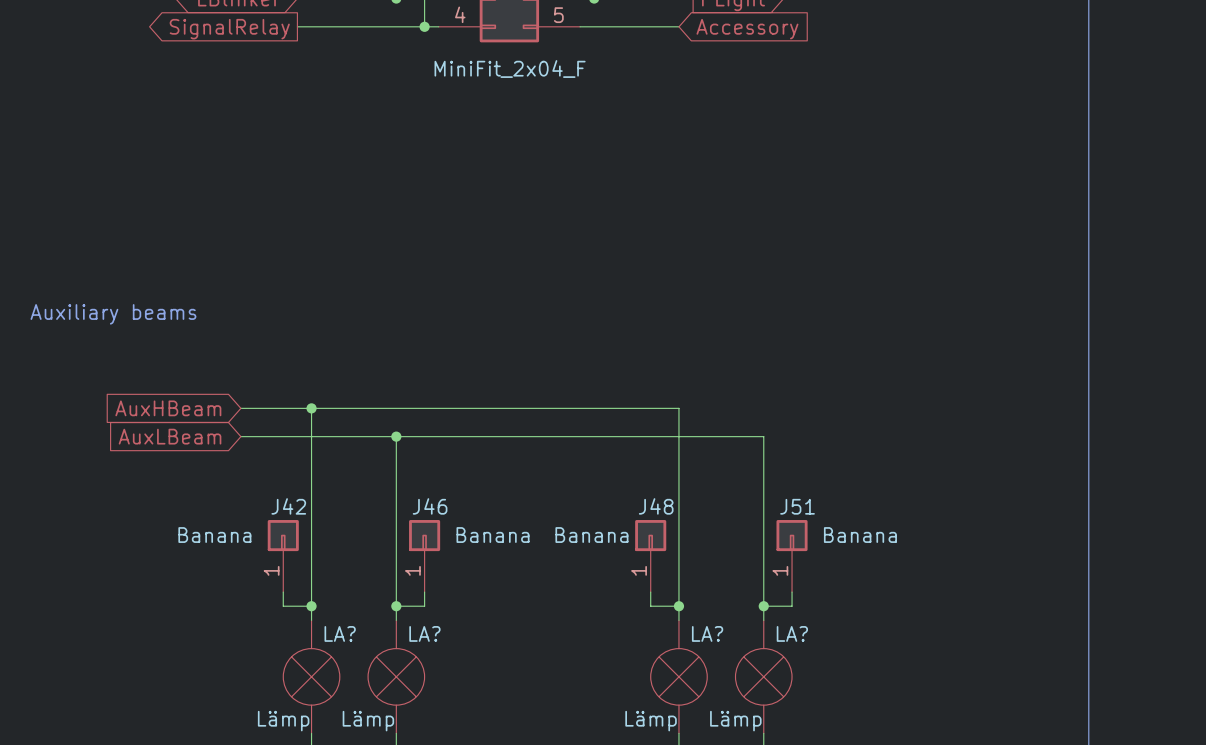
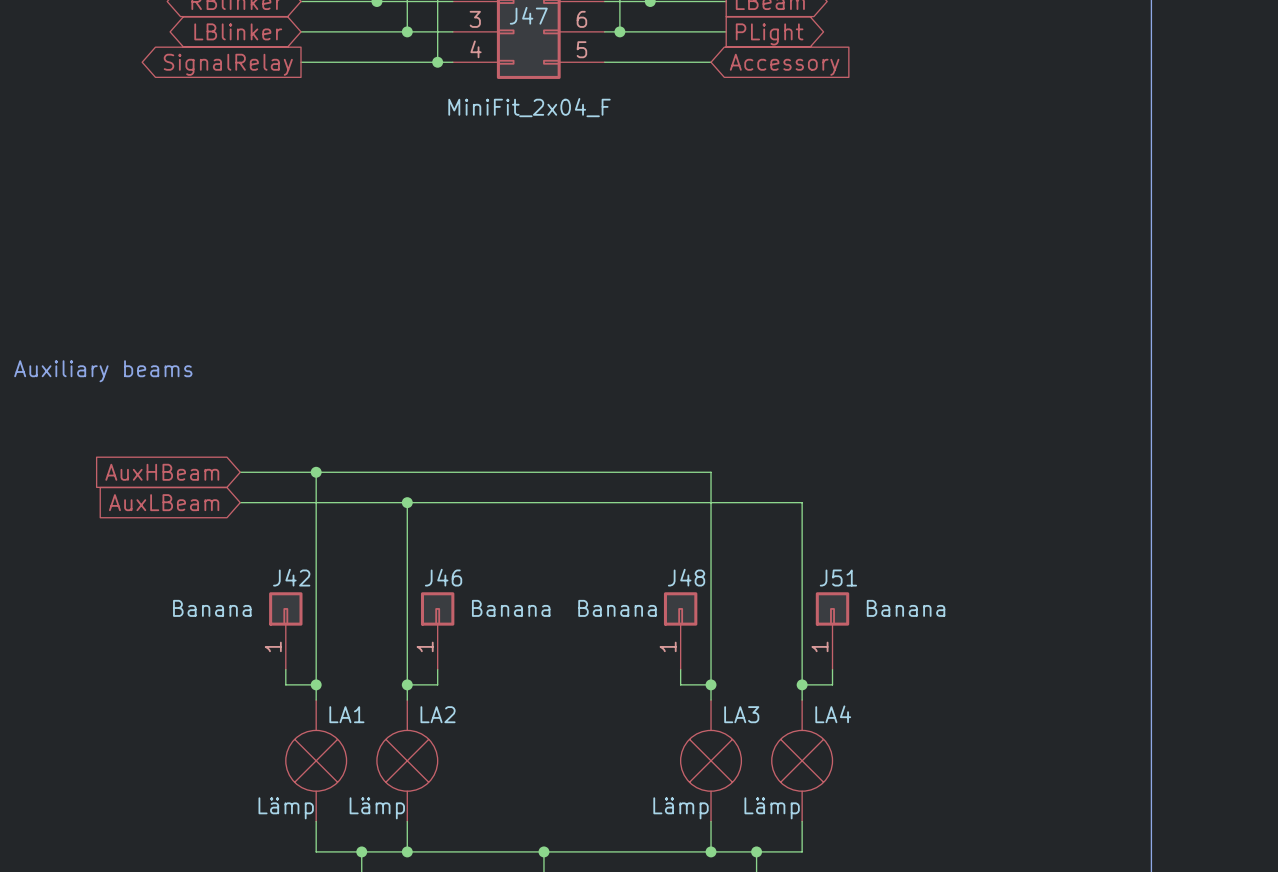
LA? name: LA? (340, 633) -> LA1 (346, 714)
LA? name: LA? (424, 633) -> LA2 (438, 714)
LA? name: LA? (707, 633) -> LA3 (741, 714)
LA? name: LA? (792, 633) -> LA4 (833, 714)

